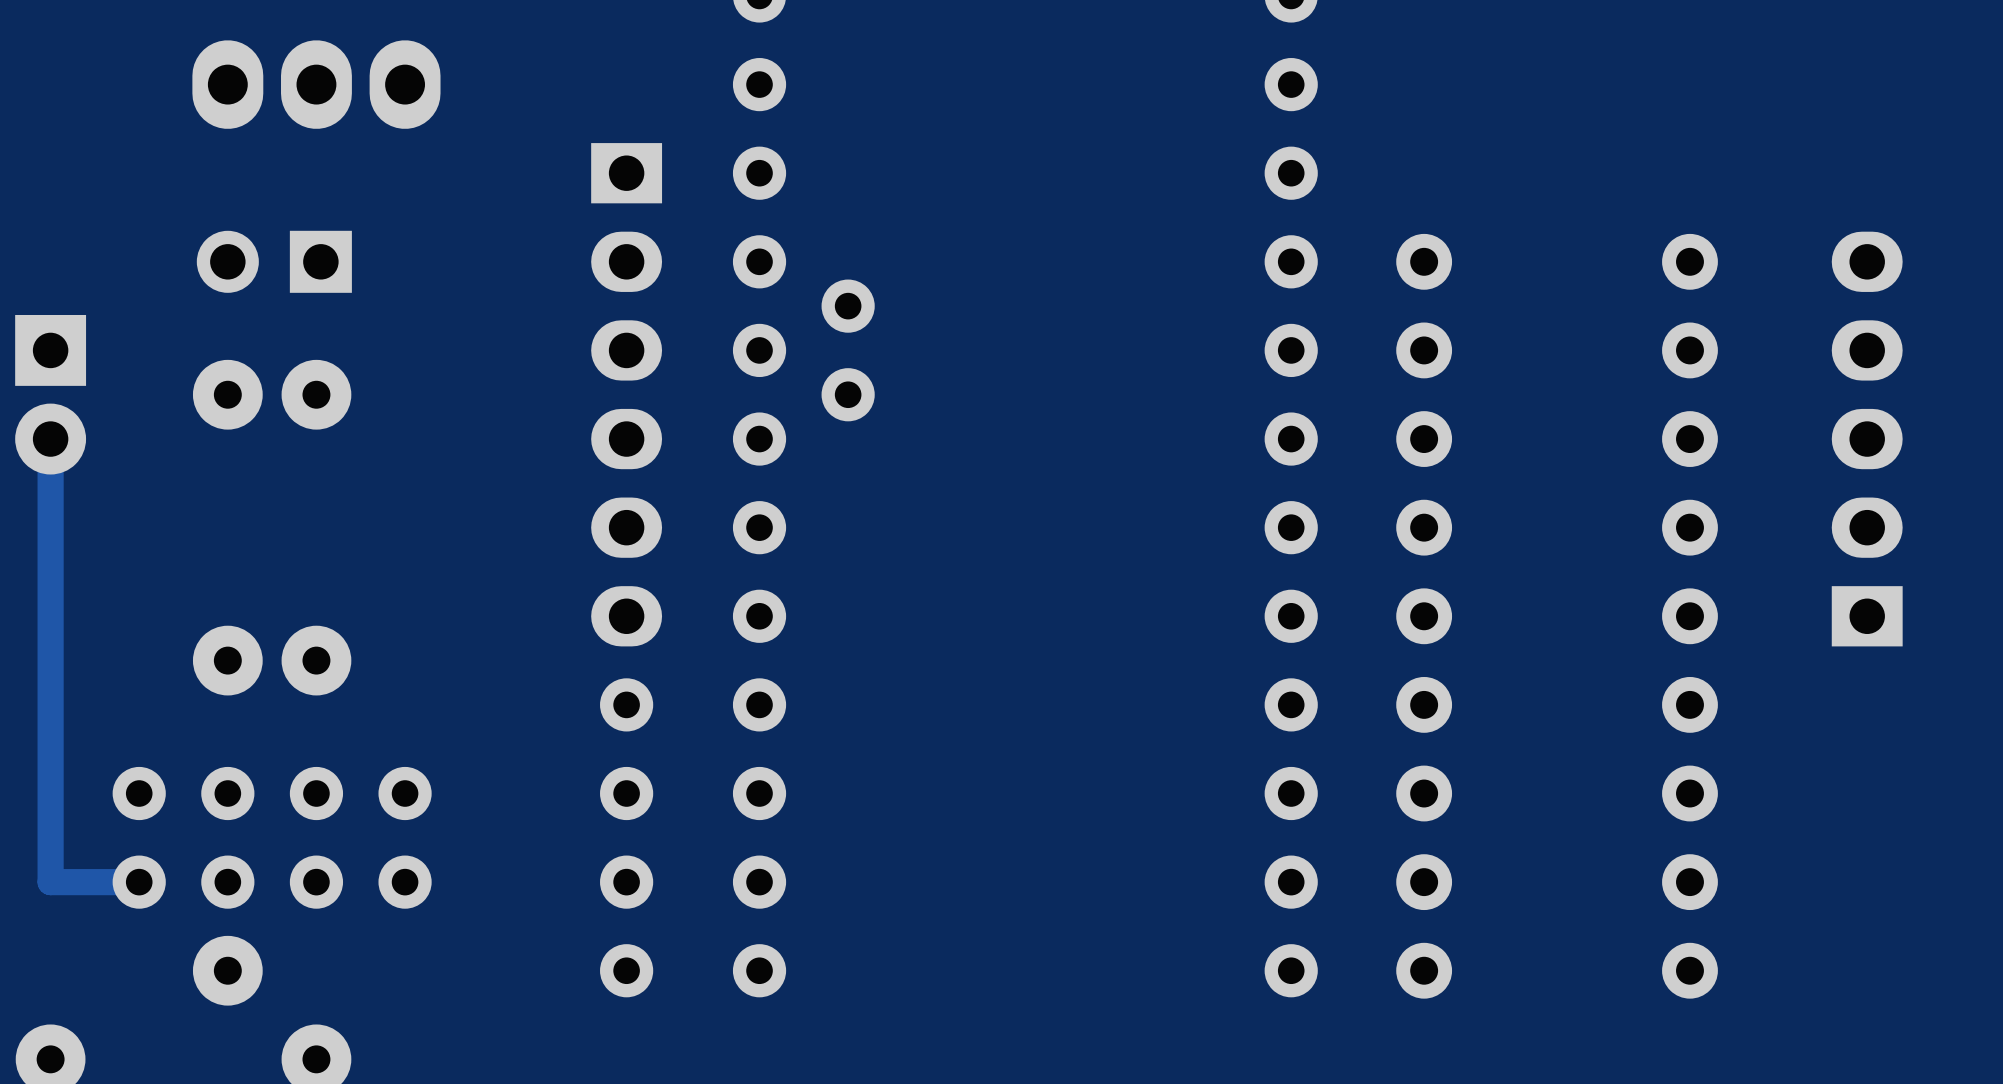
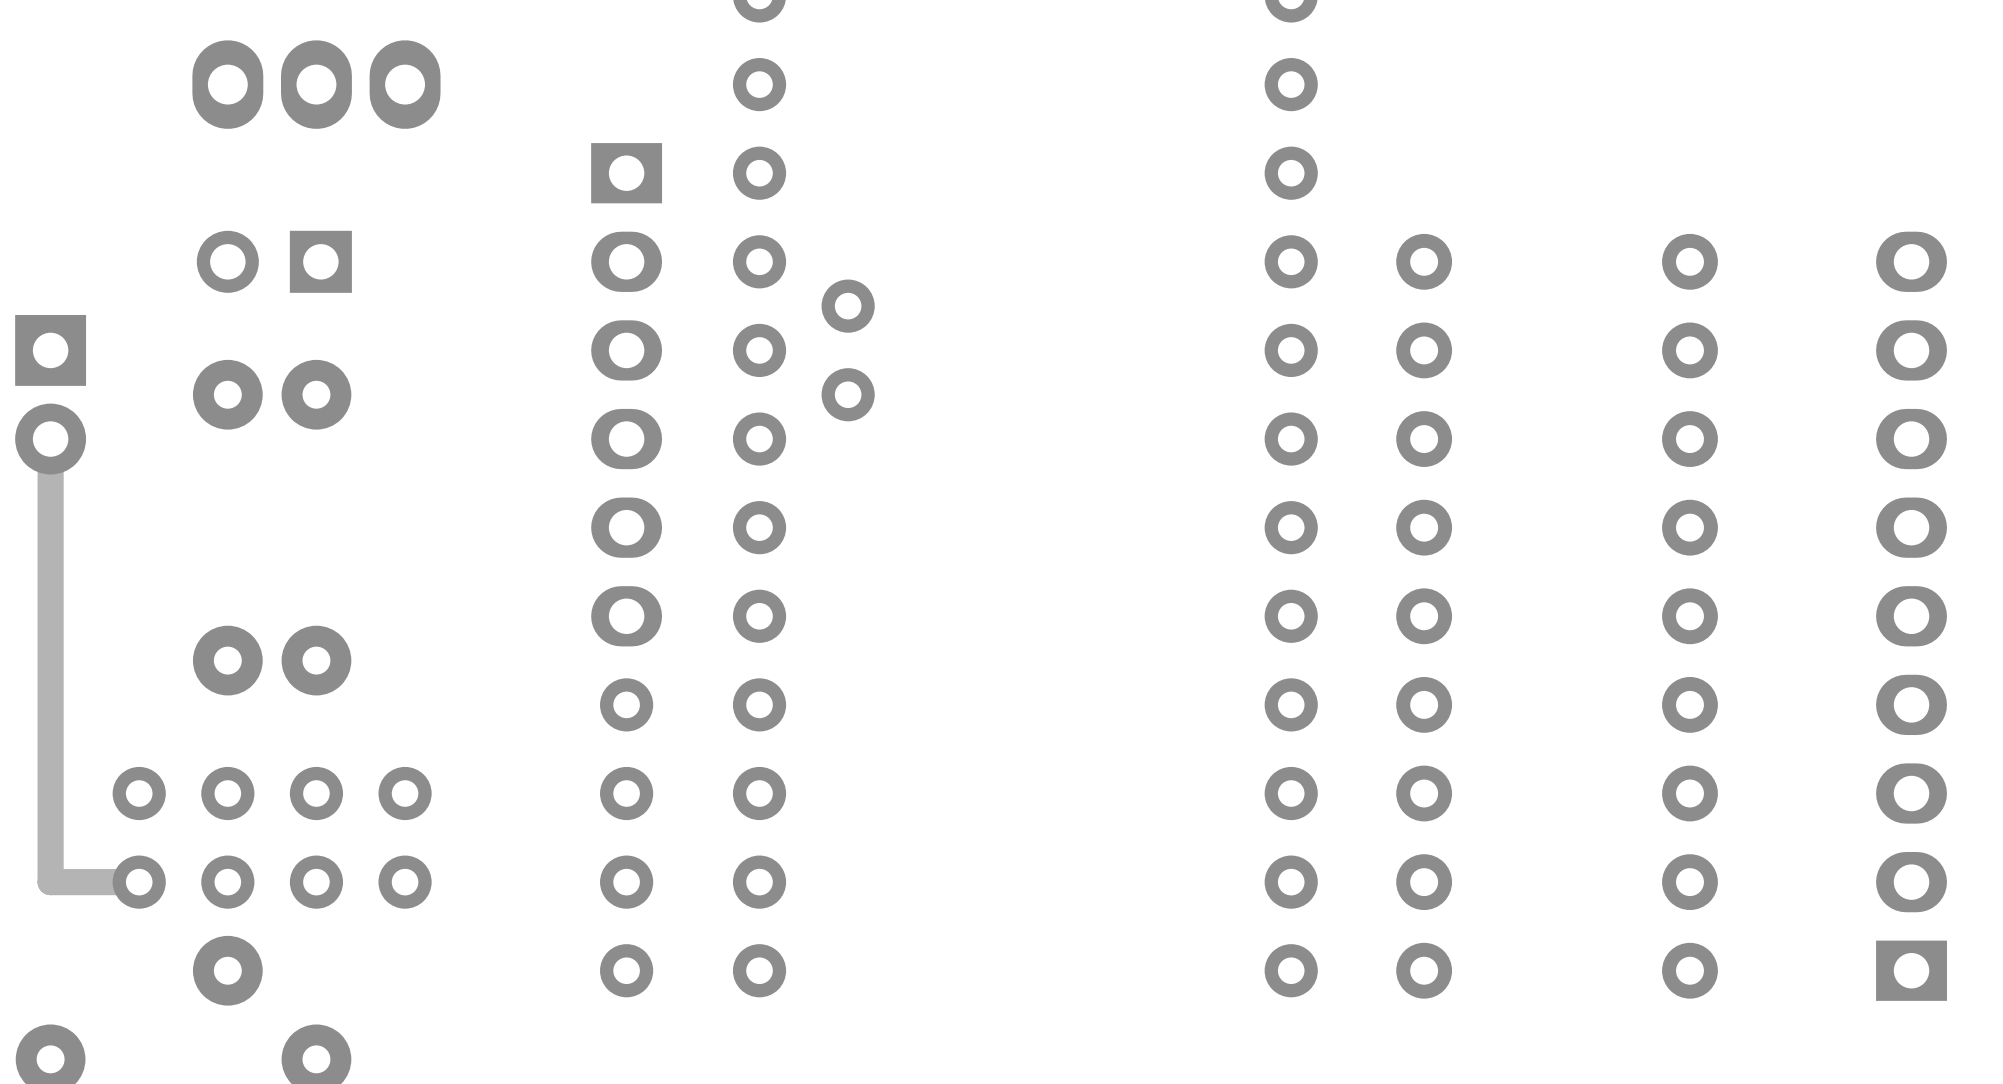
part: (1867, 439) -> none
part: none -> (1911, 616)

